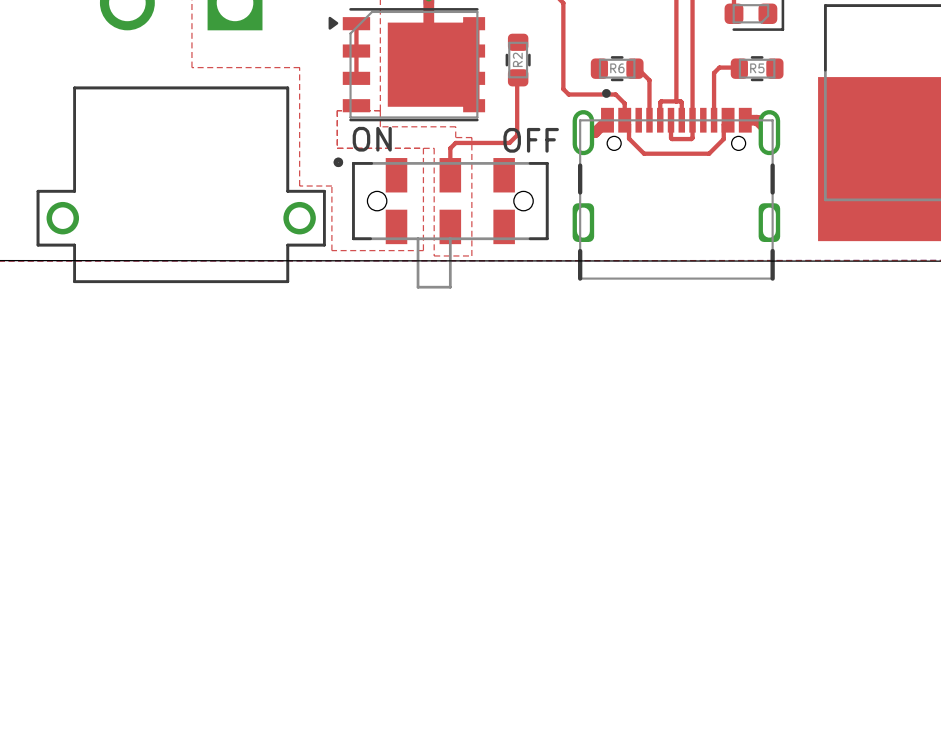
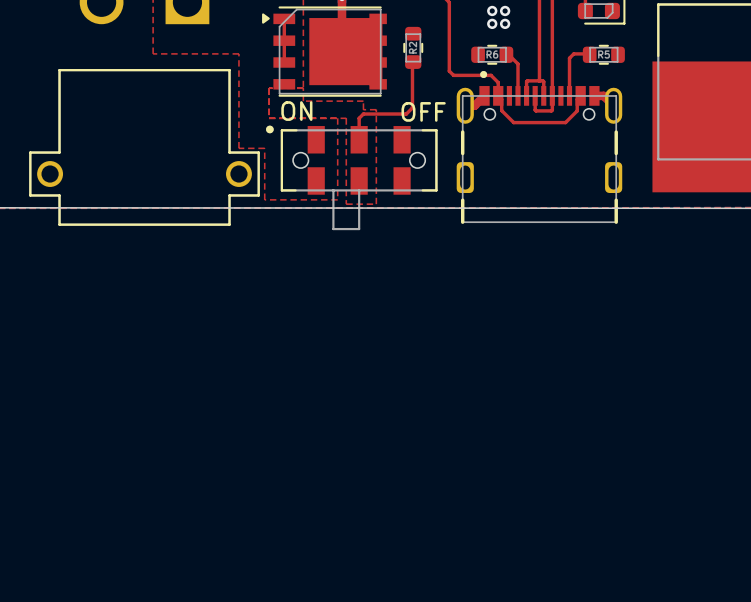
via: none -> (492, 10)
via: none -> (505, 10)
via: none -> (492, 23)
via: none -> (505, 23)

